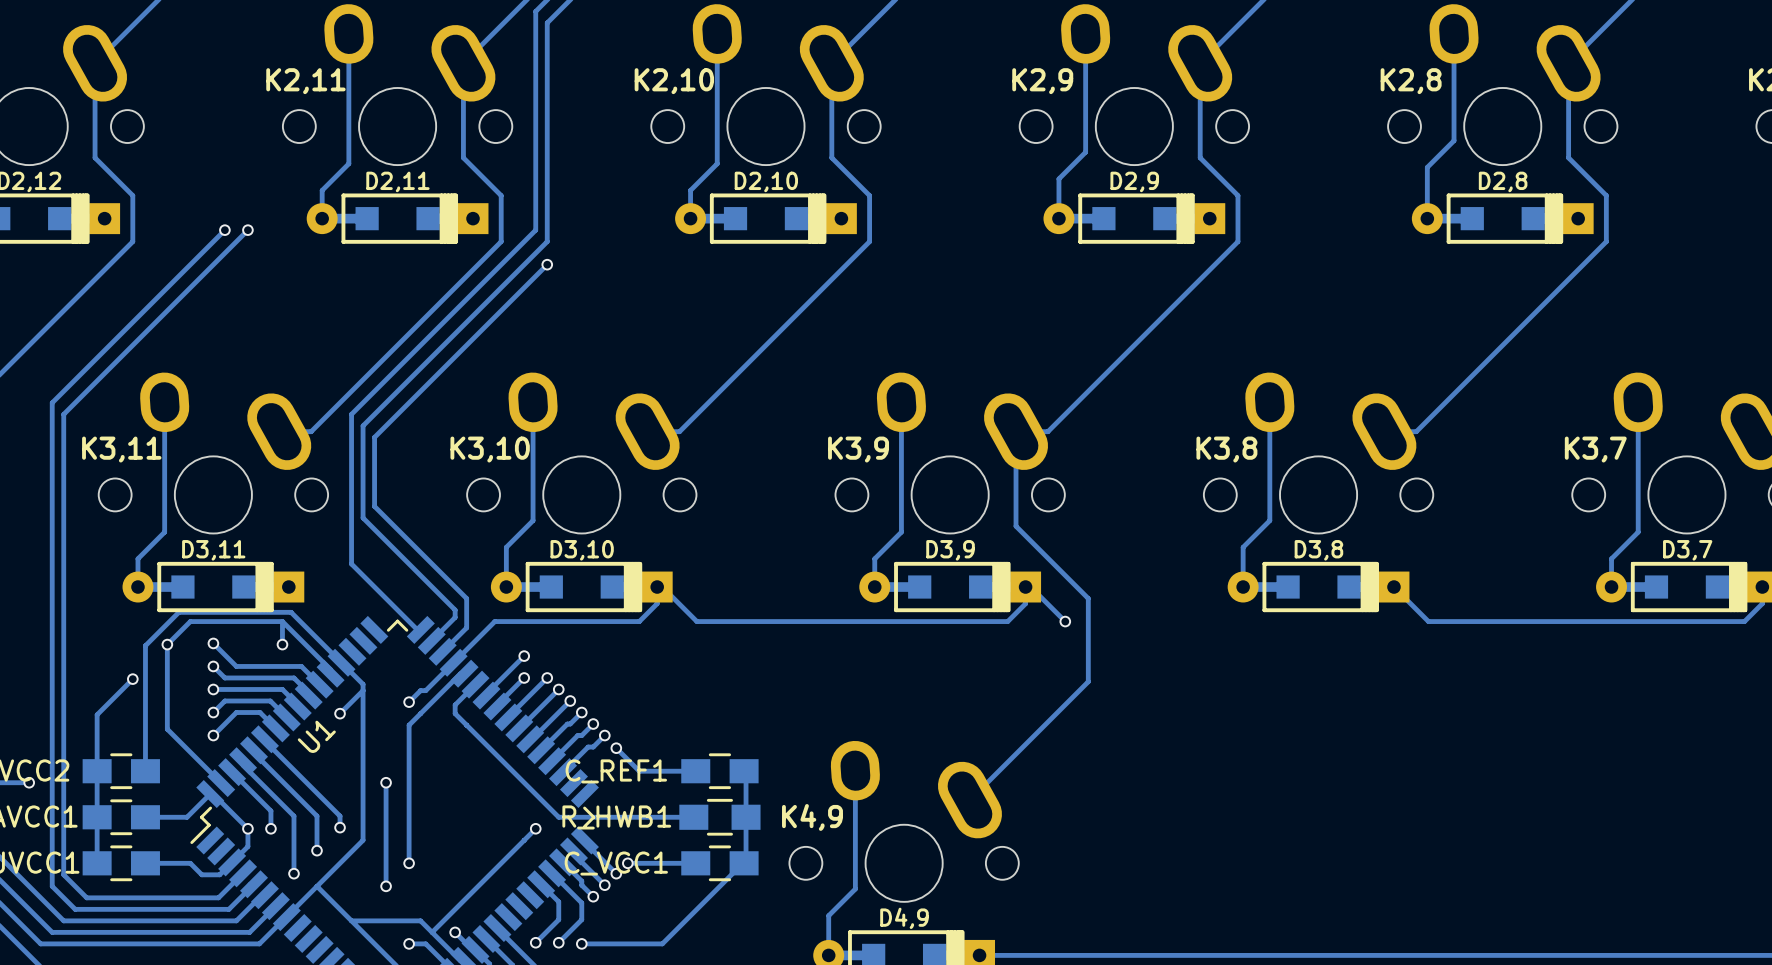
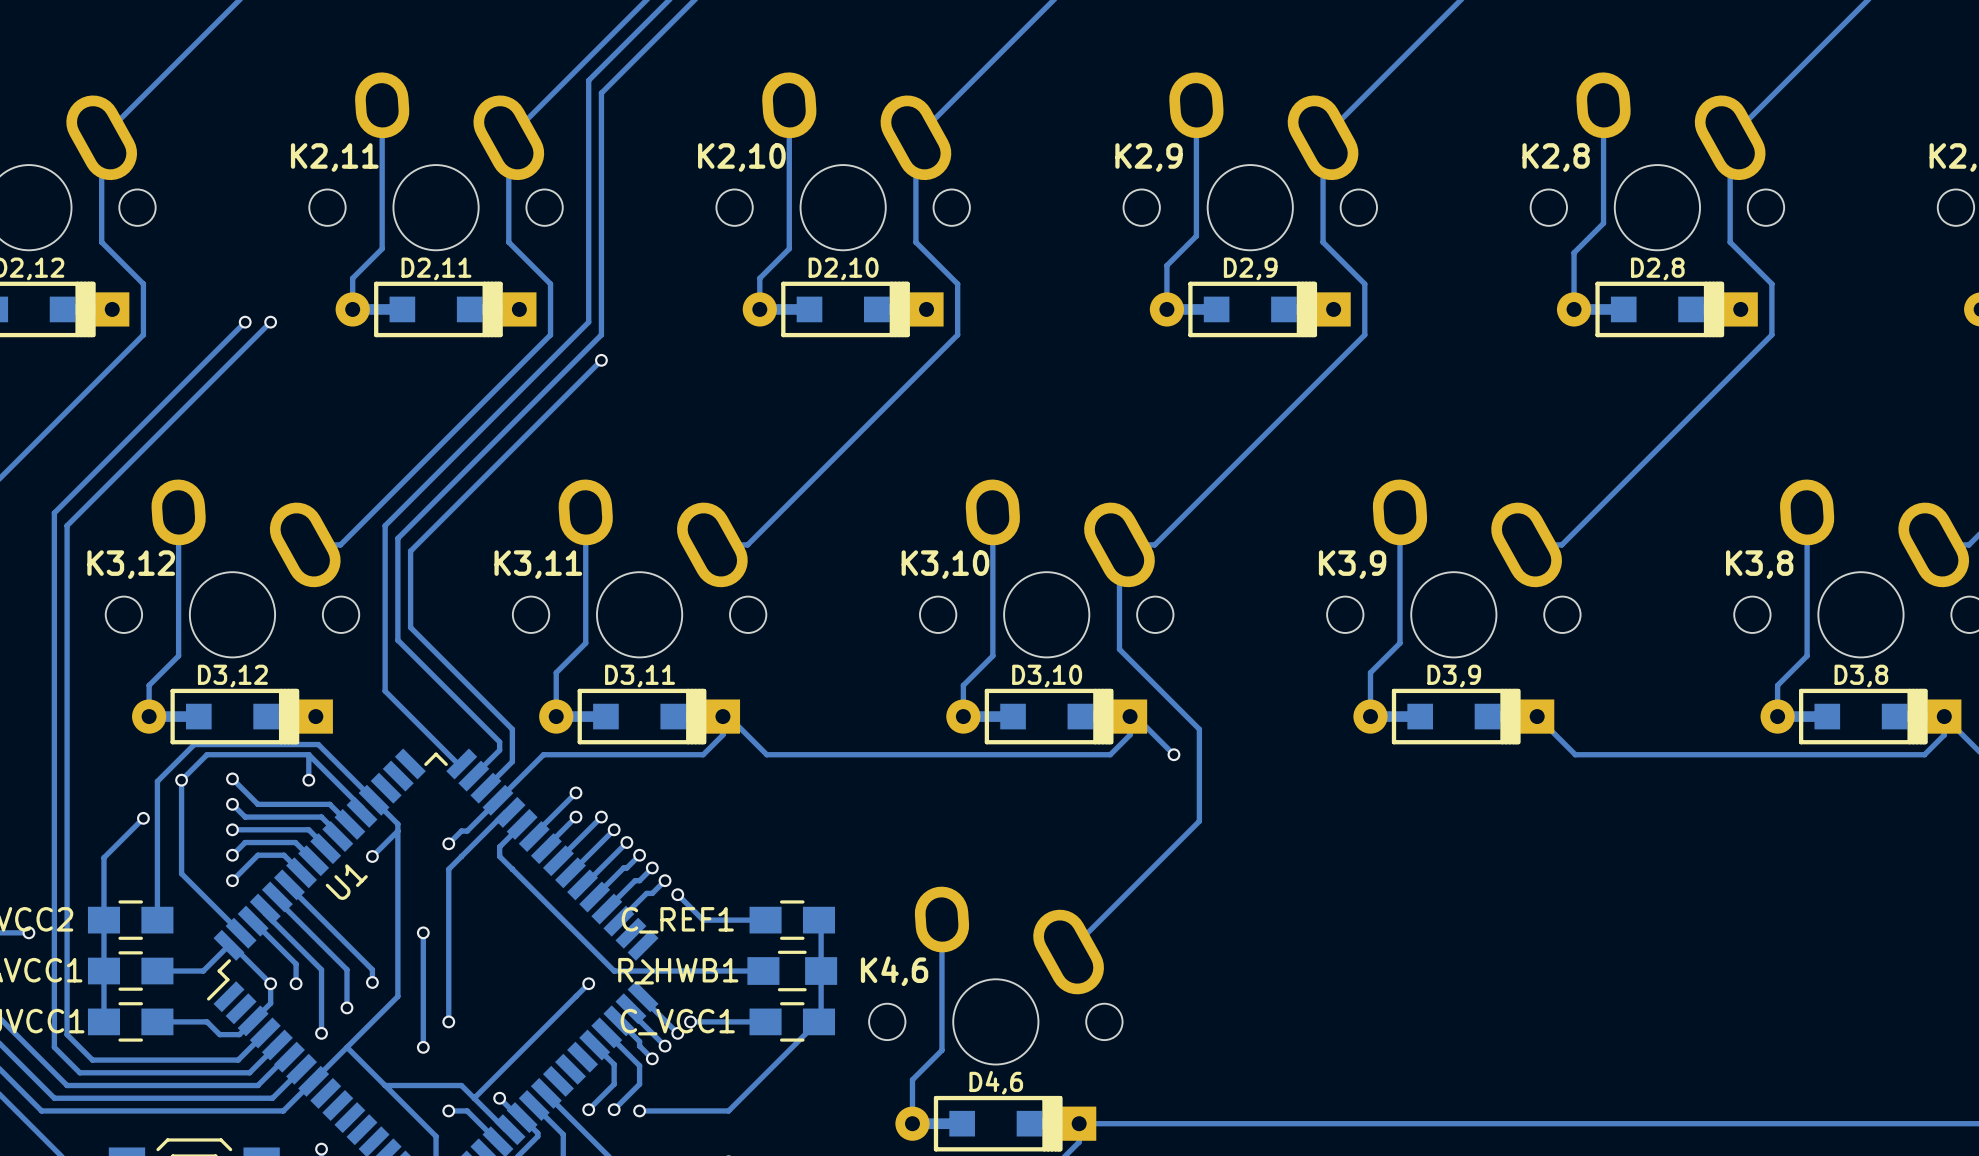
K3,11 name: K3,11 (121, 449) -> K3,12 (131, 564)
K3,10 name: K3,10 (490, 449) -> K3,11 (538, 564)
K3,9 name: K3,9 (858, 449) -> K3,10 (945, 564)
K3,8 name: K3,8 (1226, 449) -> K3,9 (1352, 564)
K3,7 name: K3,7 (1595, 449) -> K3,8 (1759, 564)
D3,11 name: D3,11 (213, 550) -> D3,12 (232, 676)
D3,10 name: D3,10 (582, 550) -> D3,11 (640, 676)
D3,9 name: D3,9 (950, 550) -> D3,10 (1047, 676)
D3,8 name: D3,8 (1318, 550) -> D3,9 (1454, 676)
D3,7 name: D3,7 (1687, 550) -> D3,8 (1861, 676)
K4,9 name: K4,9 (812, 817) -> K4,6 (894, 971)
D4,9 name: D4,9 (904, 918) -> D4,6 (996, 1082)

